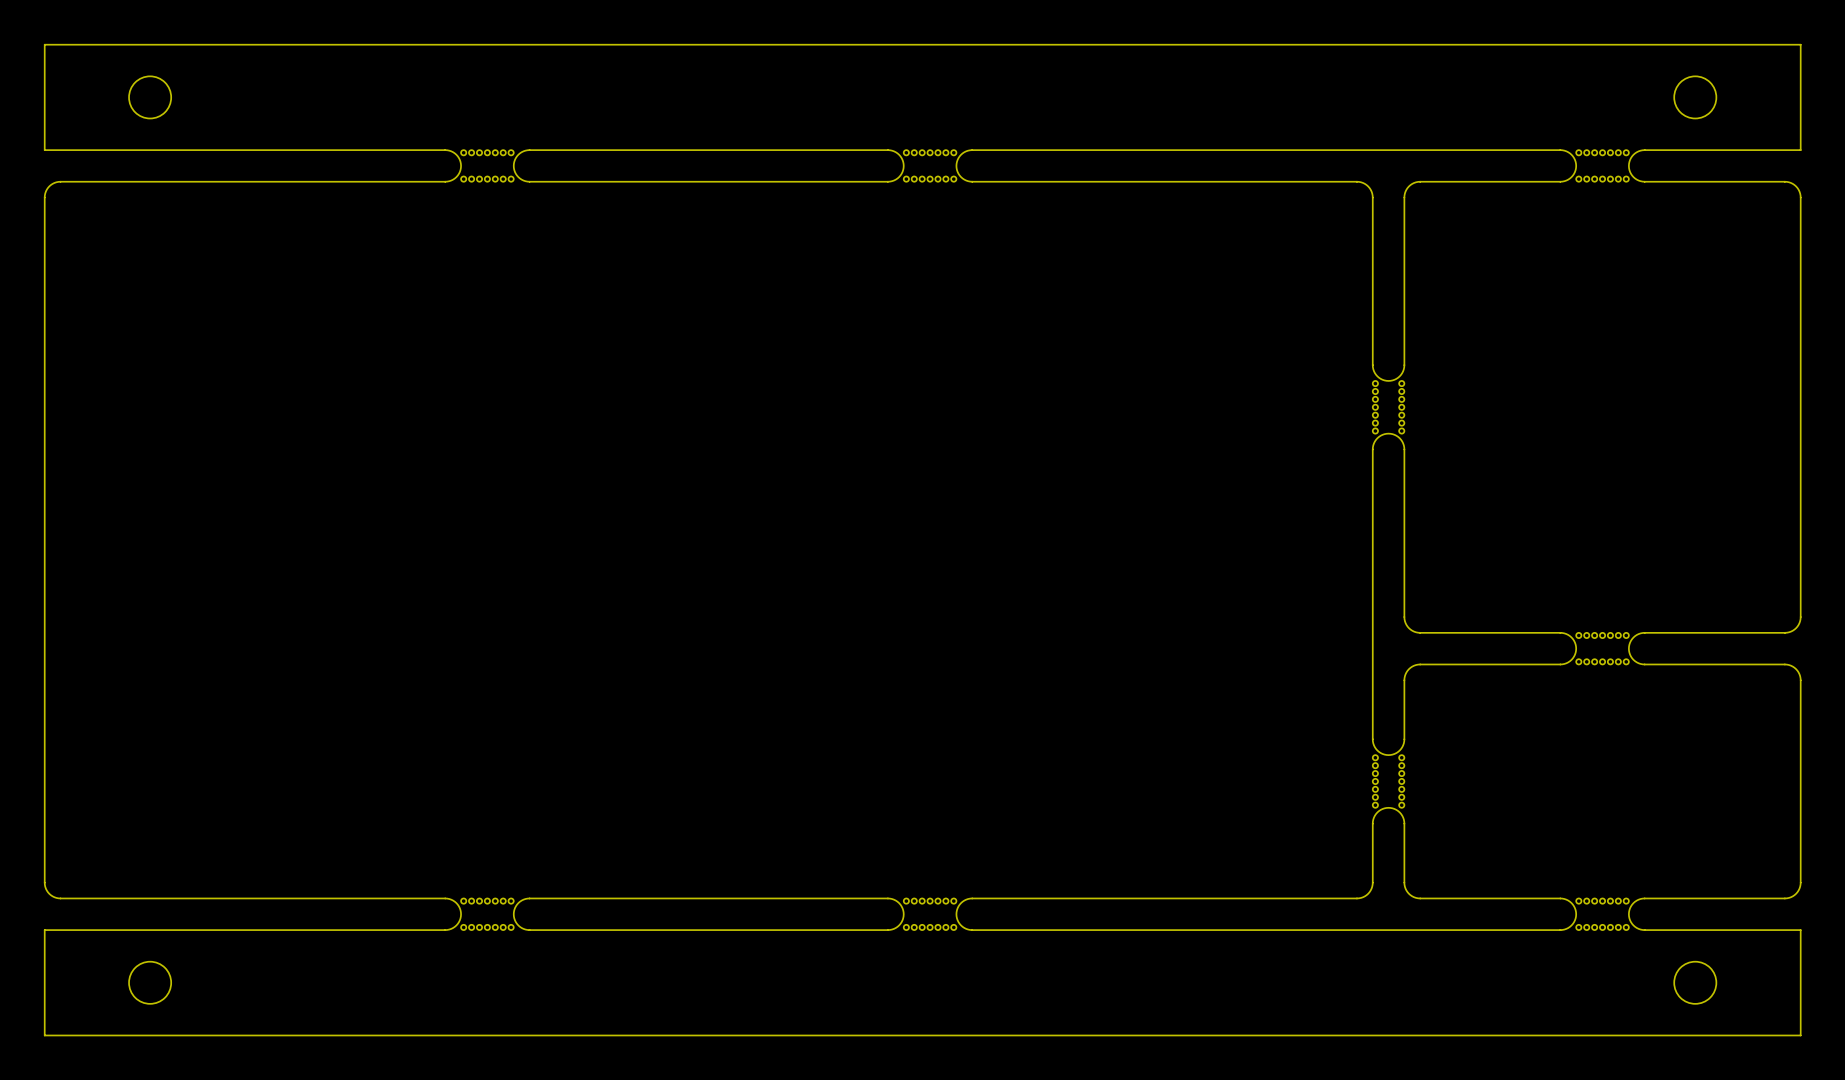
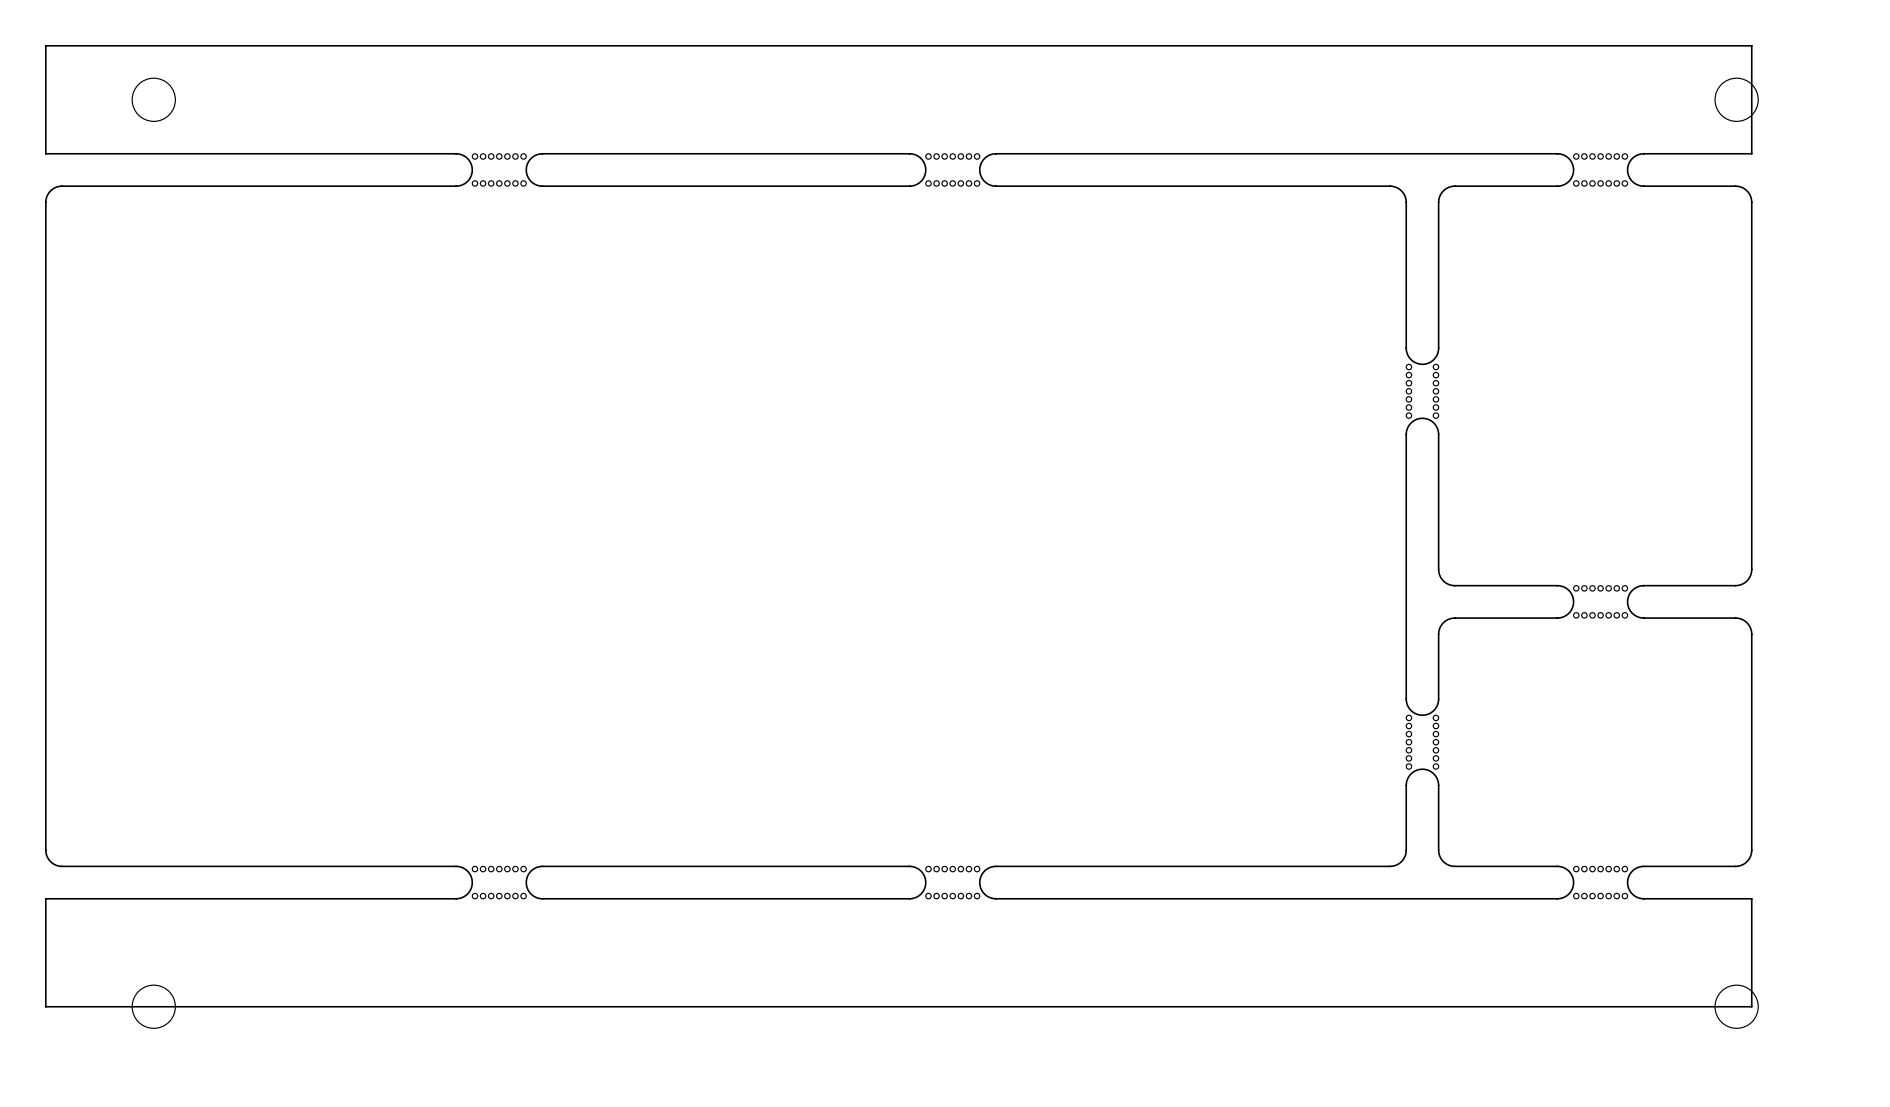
board edge: (1710, 44) (1800, 44) (1800, 150) (1710, 150) -> (1751, 45) (1751, 153)
board edge: (1520, 150) (1564, 150) (1572, 156) (1576, 165) (1572, 175) (1564, 181) (1520, 181) -> (1557, 153) (1568, 158) (1573, 169) (1568, 181) (1557, 186)
board edge: (1644, 150) (1633, 154) (1628, 165) (1633, 177) (1644, 181) -> (1684, 153) (1639, 154) (1630, 160) (1627, 169) (1630, 179) (1639, 185) (1684, 186)
part position: (1602, 165) -> (1600, 169)
board edge: (1694, 181) (1786, 181) (1796, 186) (1800, 193) (1800, 619) (1796, 628) (1786, 632) (1642, 632) (1632, 639) (1629, 650) (1633, 659) (1642, 664) (1784, 664) (1790, 665) (1797, 670) (1800, 680) (1800, 884) (1796, 893) (1786, 898) (1642, 898) (1632, 904) (1629, 916) (1633, 925) (1642, 929) (1800, 930) (1800, 1035) (44, 1035) (44, 982) -> (1735, 186) (1747, 190) (1751, 202) (1751, 573) (1745, 582) (1737, 585) (1639, 586) (1630, 592) (1627, 601) (1630, 611) (1639, 617) (1737, 618) (1745, 621) (1749, 626) (1751, 634) (1751, 852) (1747, 861) (1737, 866) (1639, 866) (1630, 872) (1627, 882) (1632, 894) (1641, 898) (1751, 898) (1751, 1006) (45, 1006)
board edge: (1372, 339) (1373, 371) (1378, 377) (1388, 380) (1398, 377) (1403, 371) (1404, 339) -> (1406, 348) (1410, 359) (1422, 364) (1433, 359) (1438, 348)
part position: (1388, 407) -> (1422, 391)
board edge: (1372, 449) (1377, 438) (1388, 433) (1399, 438) (1404, 449) -> (1406, 460) (1407, 428) (1412, 421) (1422, 418) (1432, 421) (1437, 428) (1438, 460)
board edge: (1404, 555) (1404, 619) (1407, 626) (1412, 630) (1420, 632) (1562, 632) (1572, 639) (1576, 648) (1572, 658) (1562, 664) (1418, 664) (1407, 670) (1404, 680) -> (1438, 569) (1441, 579) (1450, 585) (1559, 585) (1570, 592) (1573, 601) (1570, 611) (1559, 617) (1454, 618) (1444, 621) (1438, 632) (1438, 696)
part position: (1602, 648) -> (1600, 601)
board edge: (1372, 682) (1373, 743) (1378, 751) (1388, 755) (1398, 751) (1403, 743) (1404, 682) -> (1406, 699) (1410, 710) (1422, 715) (1433, 710) (1438, 699)
part position: (1388, 781) -> (1422, 742)
board edge: (1372, 823) (1377, 812) (1388, 807) (1399, 812) (1404, 823) -> (1406, 843) (1406, 781) (1412, 772) (1422, 769) (1432, 772) (1438, 781) (1438, 843)
board edge: (44, 829) (44, 877) -> (45, 850) (49, 860) (59, 866) (456, 866) (467, 871) (472, 882) (467, 894) (456, 898) (45, 898)
board edge: (1372, 829) (1372, 884) (1368, 893) (1361, 897) (972, 898) (966, 899) (959, 904) (956, 910) (956, 918) (962, 926) (972, 930) (1560, 930) (1568, 927) (1574, 922) (1576, 916) (1574, 908) (1570, 901) (1562, 898) (1420, 898) (1412, 896) (1407, 892) (1404, 884) (1404, 829) -> (1406, 850) (1401, 861) (1390, 866) (993, 866) (983, 872) (979, 884) (984, 894) (995, 898) (1557, 898) (1567, 895) (1573, 886) (1571, 874) (1561, 866) (1452, 866) (1441, 860) (1438, 850)
board edge: (44, 882) (49, 893) (58, 898) (445, 898) (456, 903) (461, 914) (456, 925) (445, 930) (44, 930) -> (45, 904) (45, 952)
board edge: (529, 898) (887, 898) (899, 903) (903, 914) (899, 925) (887, 930) (529, 930) (518, 925) (513, 914) (518, 903) (529, 898) -> (542, 866) (909, 866) (921, 871) (925, 882) (921, 894) (909, 898) (542, 898) (531, 894) (526, 882) (531, 871) (542, 866)
part position: (487, 914) -> (499, 882)
part position: (930, 914) -> (952, 882)
part position: (1602, 914) -> (1600, 882)

